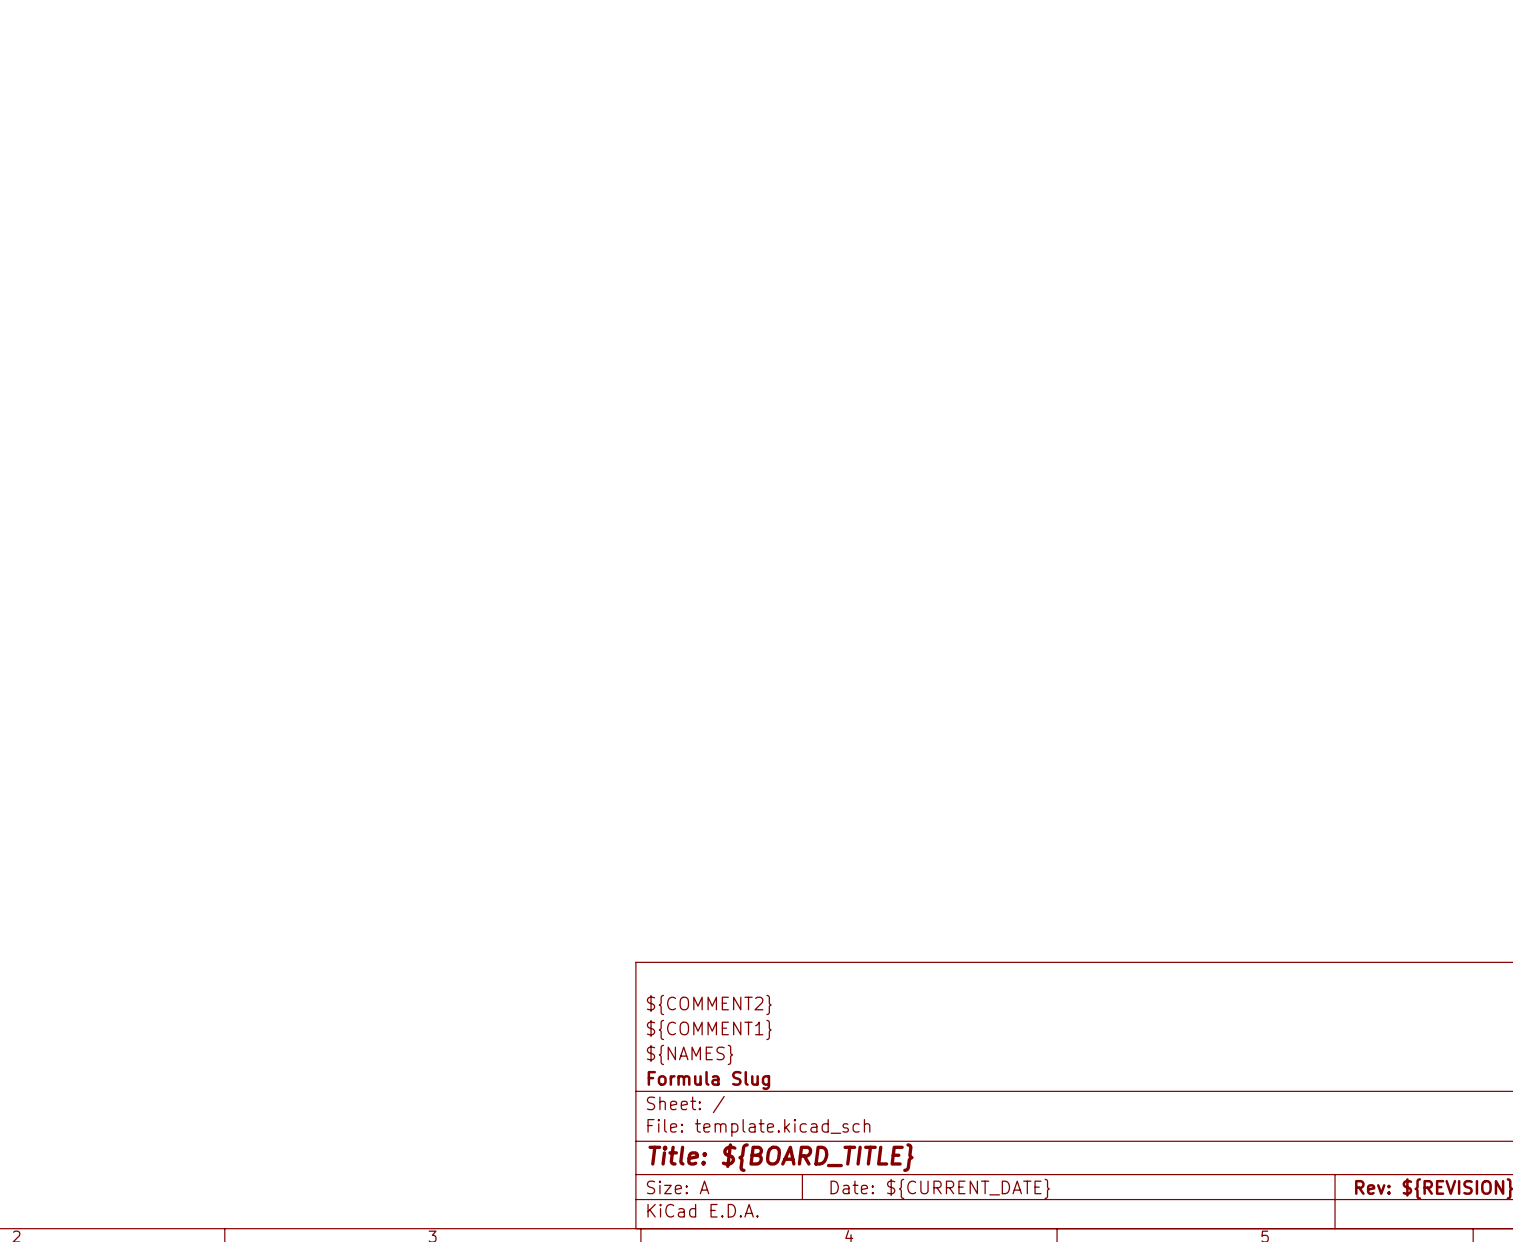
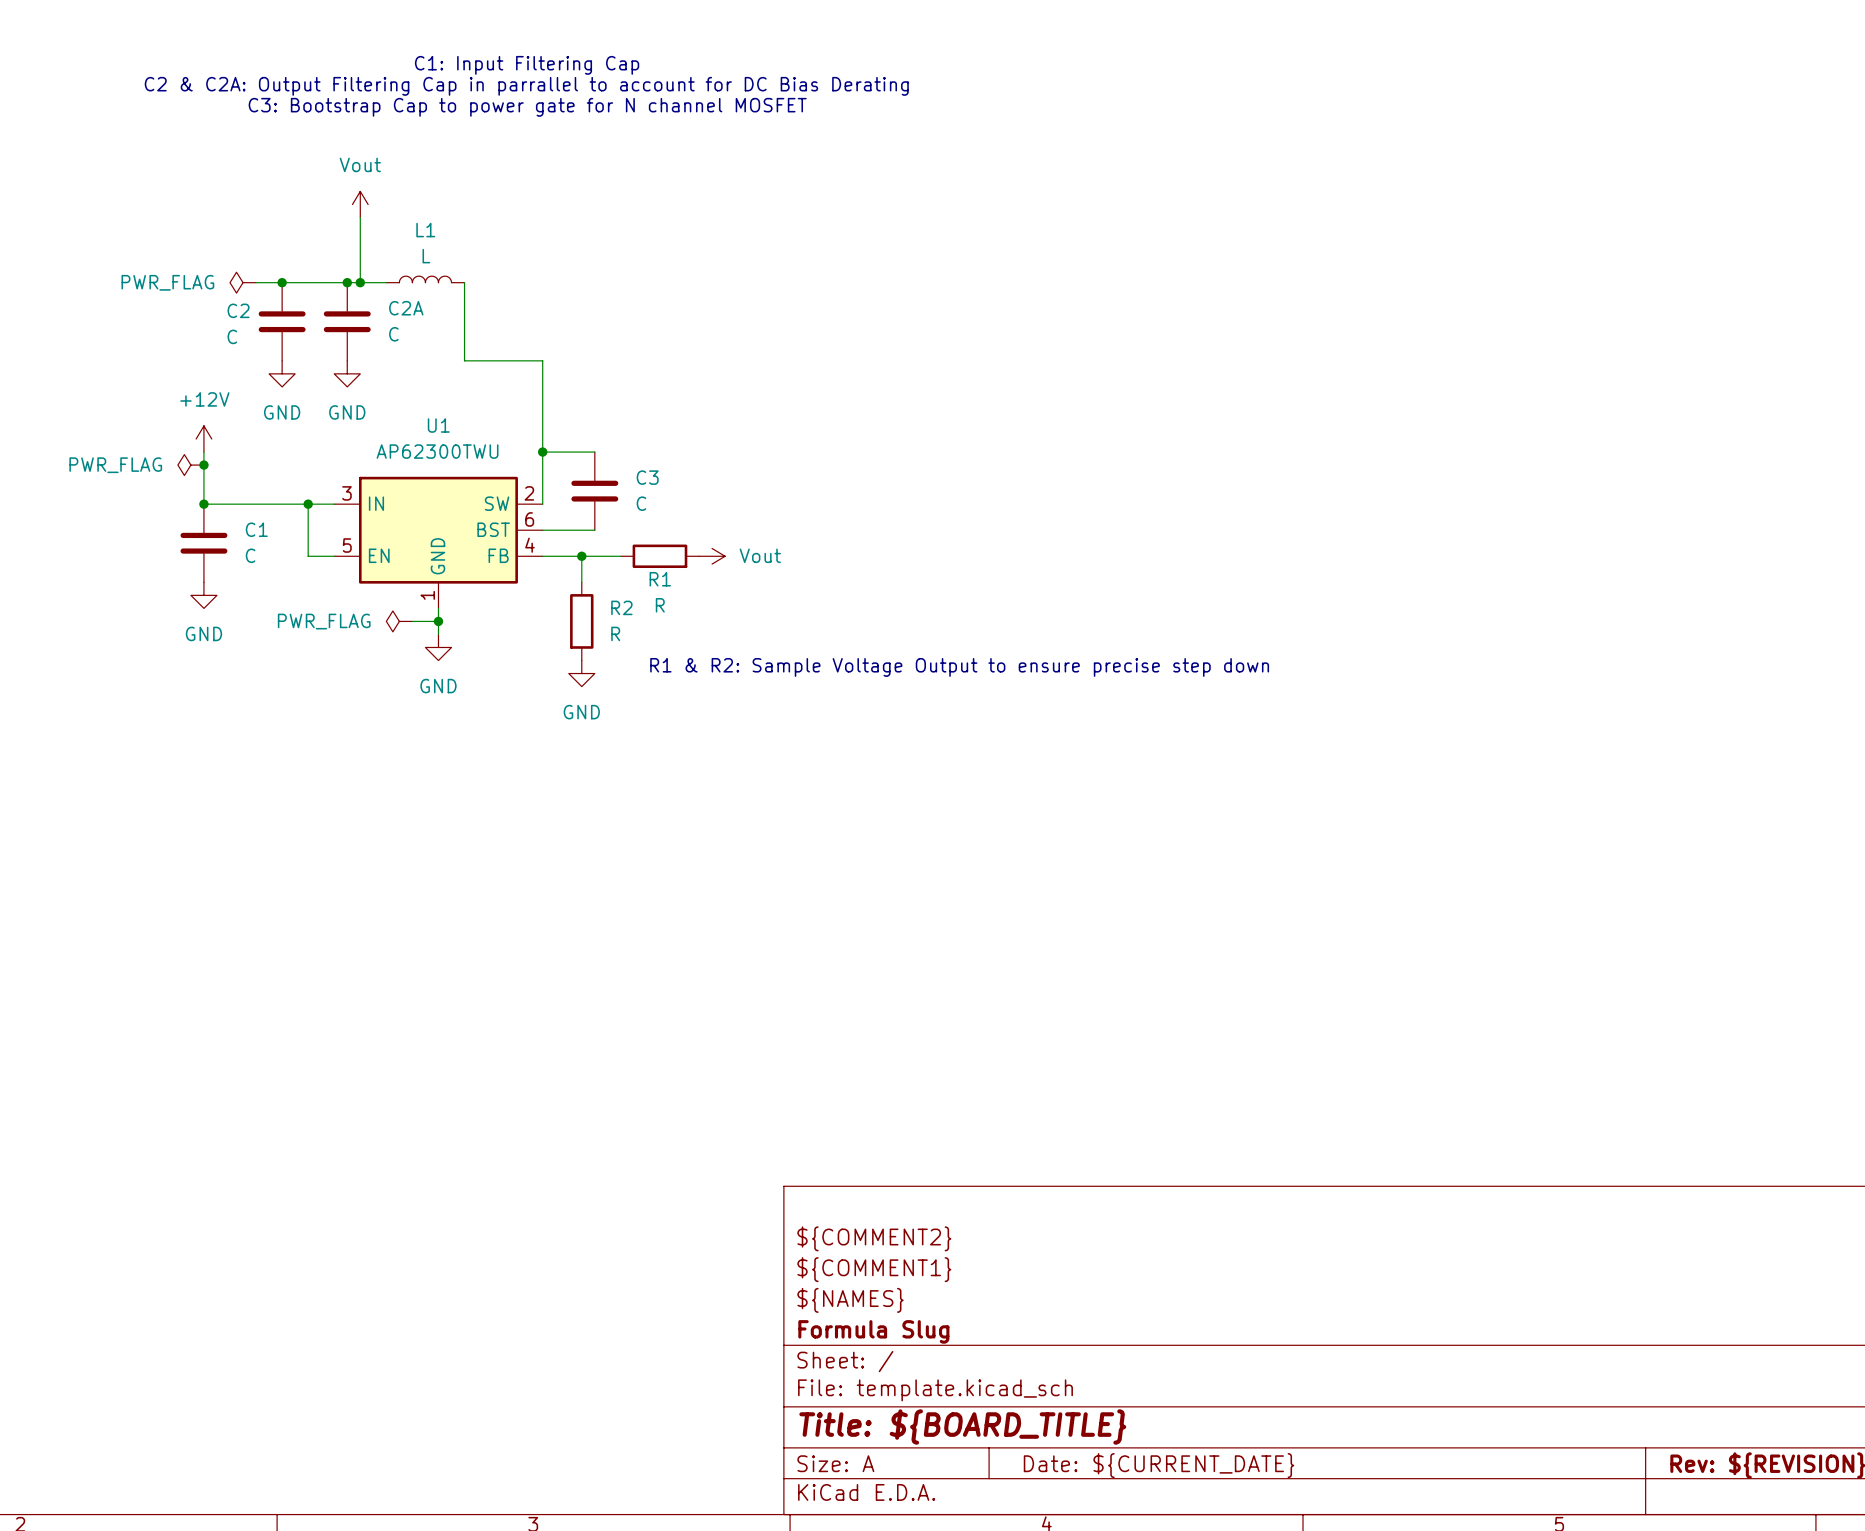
text: none -> C1: Input Filtering Cap (527, 65)
text: none -> C2 & C2A: Output Filtering Cap in parrallel to account for DC Bias Derating (526, 86)
text: none -> C3: Bootstrap Cap to power gate for N channel MOSFET (527, 107)
power symbol: none -> Vout (360, 204)
wire: none -> (360, 217) (360, 282)
L1: none -> L (425, 279)
power symbol: none -> PWR_FLAG (243, 282)
wire: none -> (256, 282) (386, 282)
junction: none -> (282, 282)
junction: none -> (347, 282)
junction: none -> (360, 282)
wire: none -> (464, 282) (464, 360) (542, 360) (542, 504)
C2: none -> C (282, 321)
C2A: none -> C (347, 321)
power symbol: none -> GND (282, 373)
power symbol: none -> GND (347, 373)
power symbol: none -> +12V (203, 439)
wire: none -> (203, 452) (203, 504) (334, 504)
wire: none -> (542, 452) (594, 452)
junction: none -> (542, 452)
power symbol: none -> PWR_FLAG (190, 465)
junction: none -> (203, 465)
C3: none -> C (594, 491)
junction: none -> (203, 504)
wire: none -> (308, 504) (308, 556) (334, 556)
junction: none -> (308, 504)
wire: none -> (542, 530) (594, 530)
C1: none -> C (203, 543)
U1: none -> AP62300TWU (438, 542)
wire: none -> (542, 556) (620, 556)
wire: none -> (581, 556) (581, 582)
junction: none -> (581, 556)
R1: none -> R (659, 556)
power symbol: none -> Vout (712, 556)
power symbol: none -> GND (203, 595)
wire: none -> (438, 608) (438, 634)
power symbol: none -> PWR_FLAG (399, 621)
wire: none -> (412, 621) (438, 621)
junction: none -> (438, 621)
R2: none -> R (581, 621)
power symbol: none -> GND (438, 647)
text: none -> R1 & R2: Sample Voltage Output to ensure precise step down (959, 667)
power symbol: none -> GND (581, 673)

